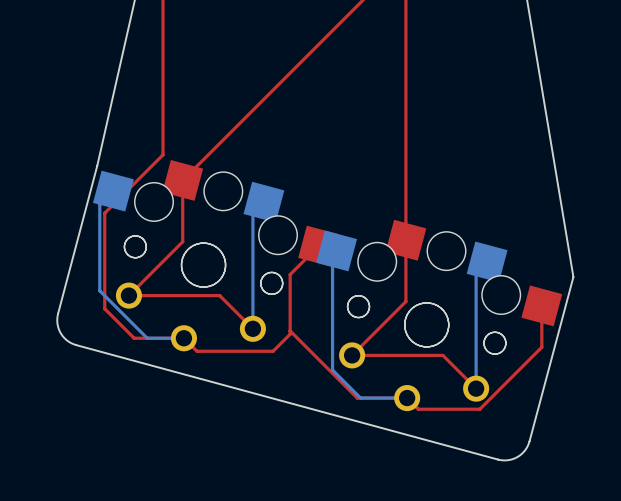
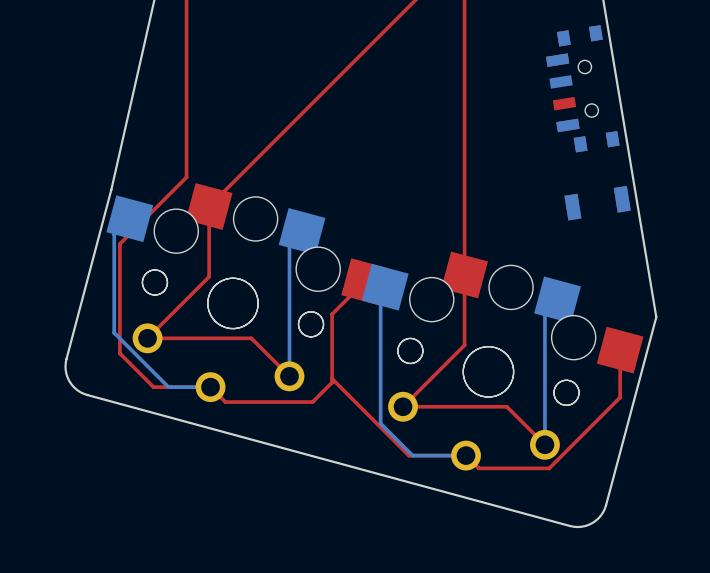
part: none -> (582, 88)
part: none -> (597, 203)

